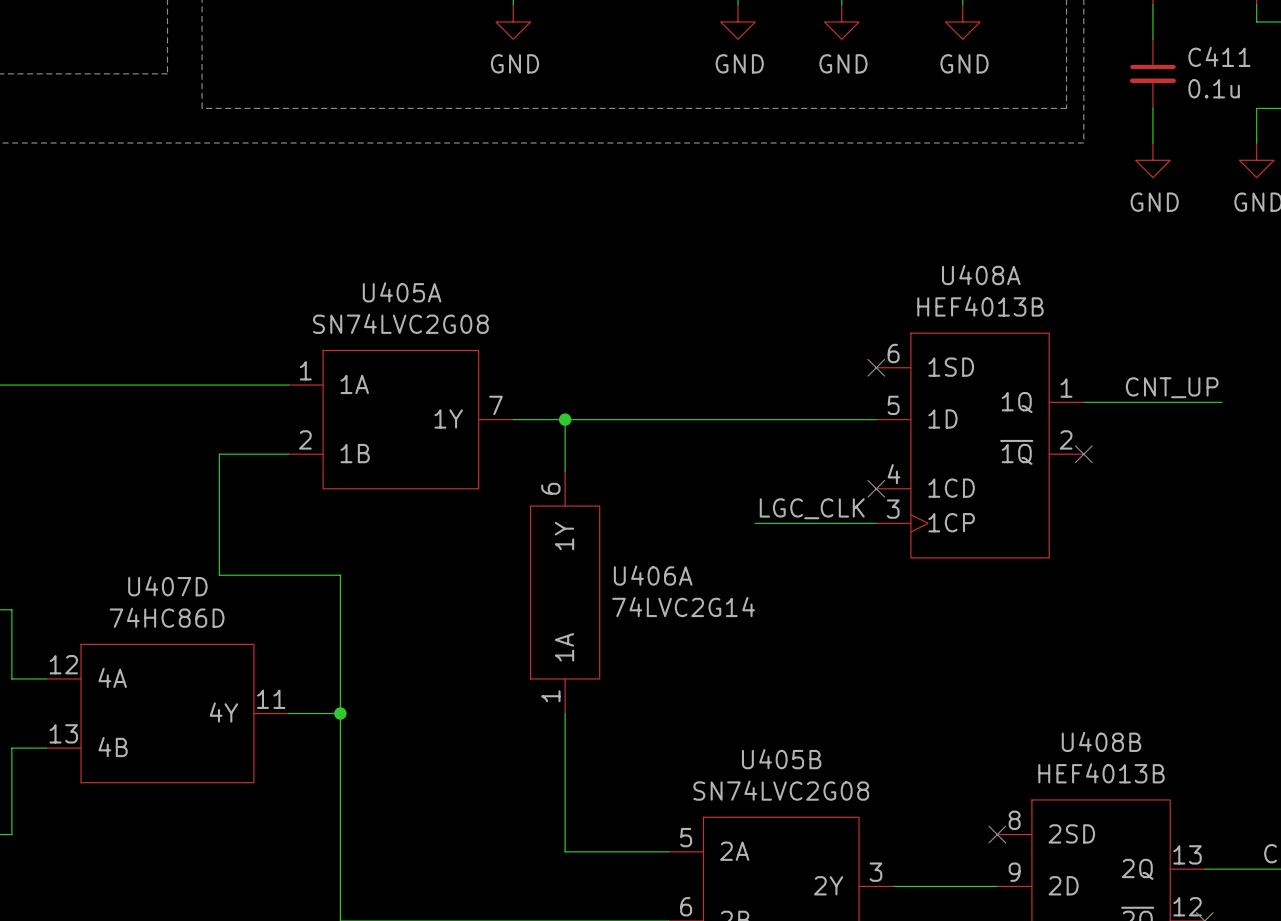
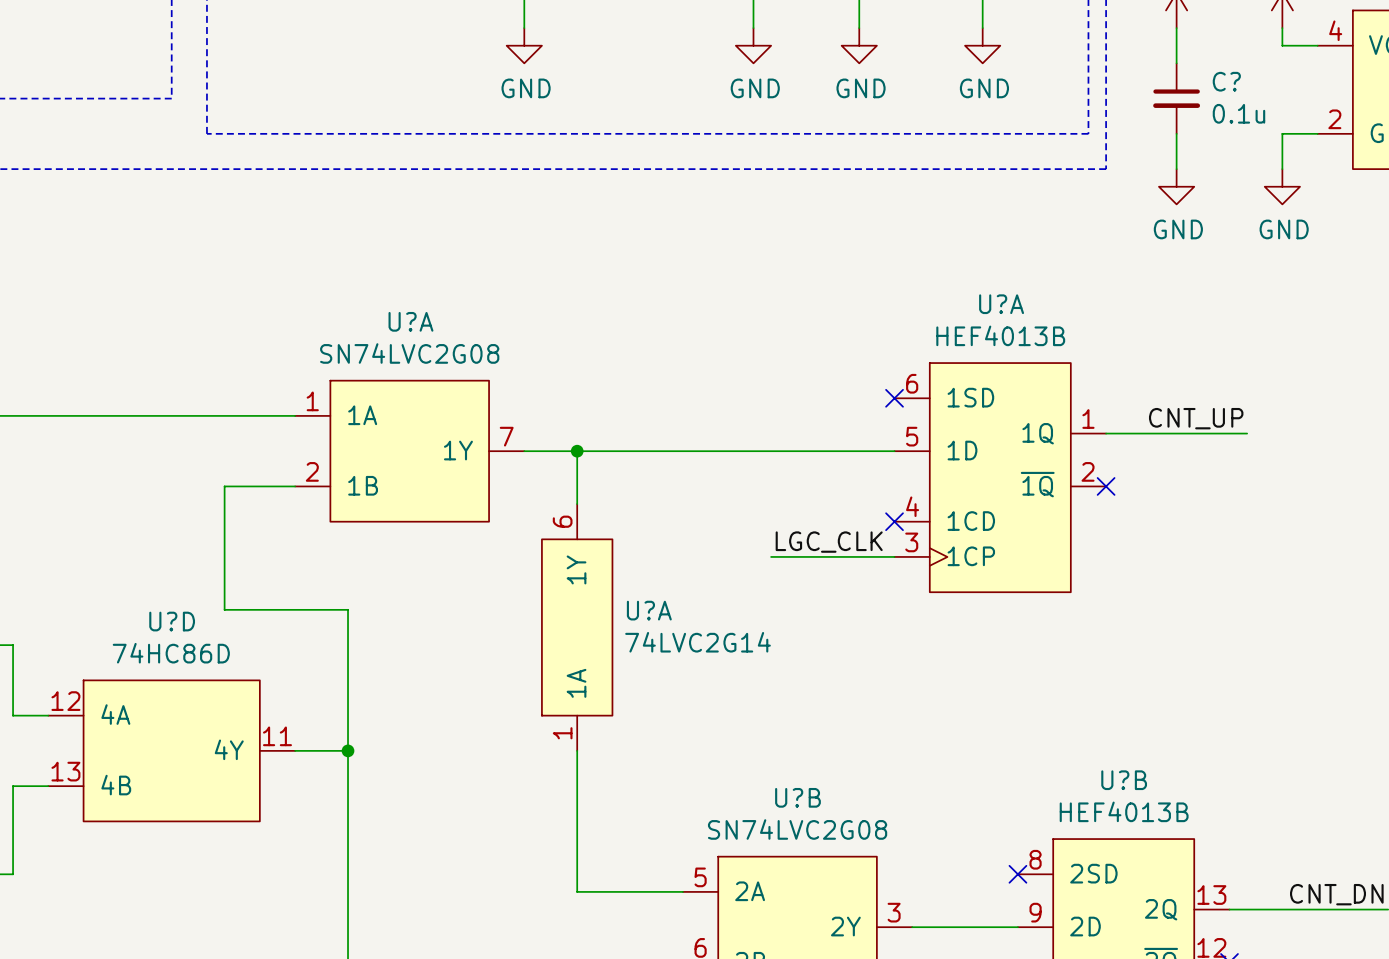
C411 name: C411 (1219, 56) -> C? (1226, 81)
U408A name: U408A (981, 275) -> U?A (1001, 304)
U405A name: U405A (402, 292) -> U?A (410, 321)
U406A name: U406A (653, 575) -> U?A (649, 610)
U407D name: U407D (167, 586) -> U?D (172, 621)
U408B name: U408B (1101, 741) -> U?B (1124, 780)
U405B name: U405B (781, 759) -> U?B (797, 797)

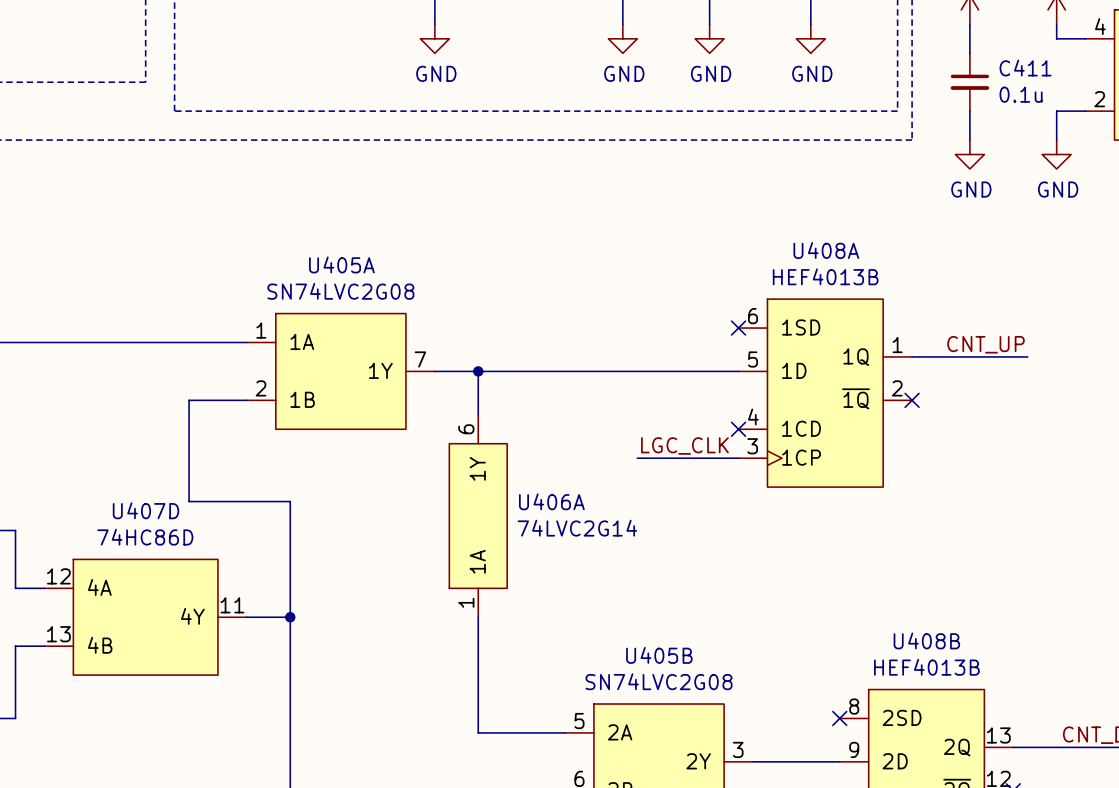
C? name: C? (1226, 81) -> C411 (1025, 68)
U?A name: U?A (1001, 304) -> U408A (826, 250)
U?A name: U?A (410, 321) -> U405A (341, 264)
U?A name: U?A (649, 610) -> U406A (551, 501)
U?D name: U?D (172, 621) -> U407D (146, 510)
U?B name: U?B (1124, 780) -> U408B (926, 640)
U?B name: U?B (797, 797) -> U405B (659, 655)

